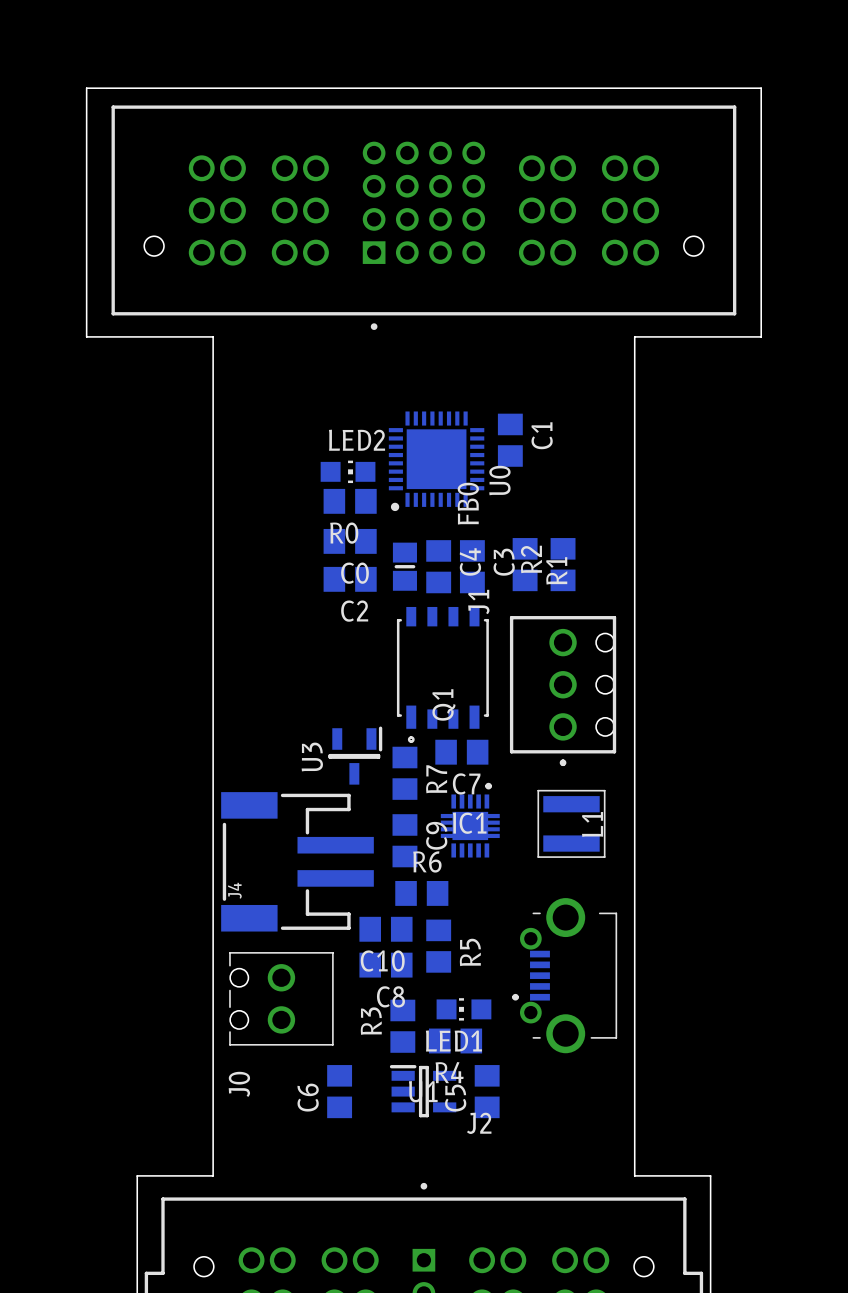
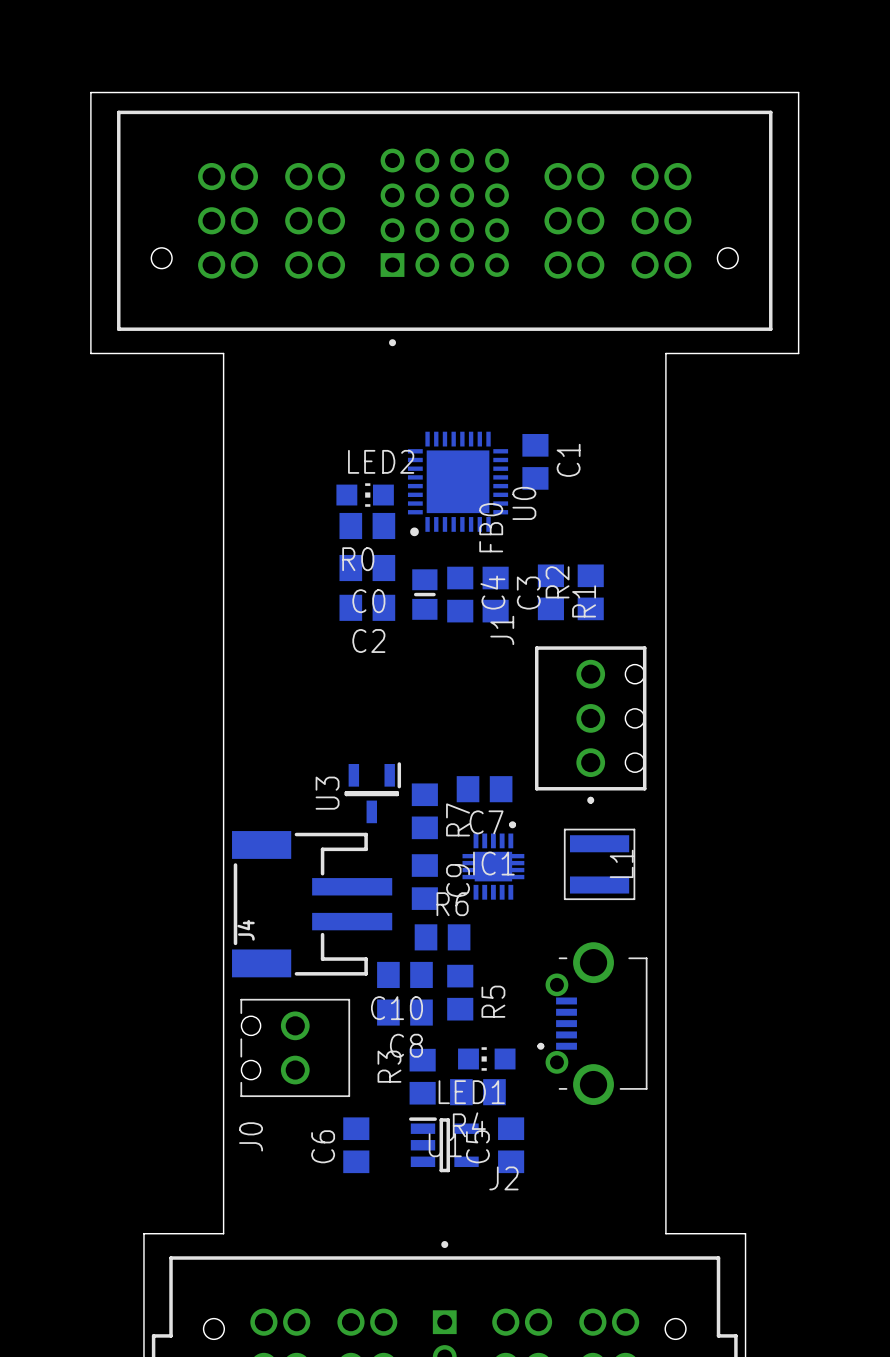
Q1: (442, 674) -> none

